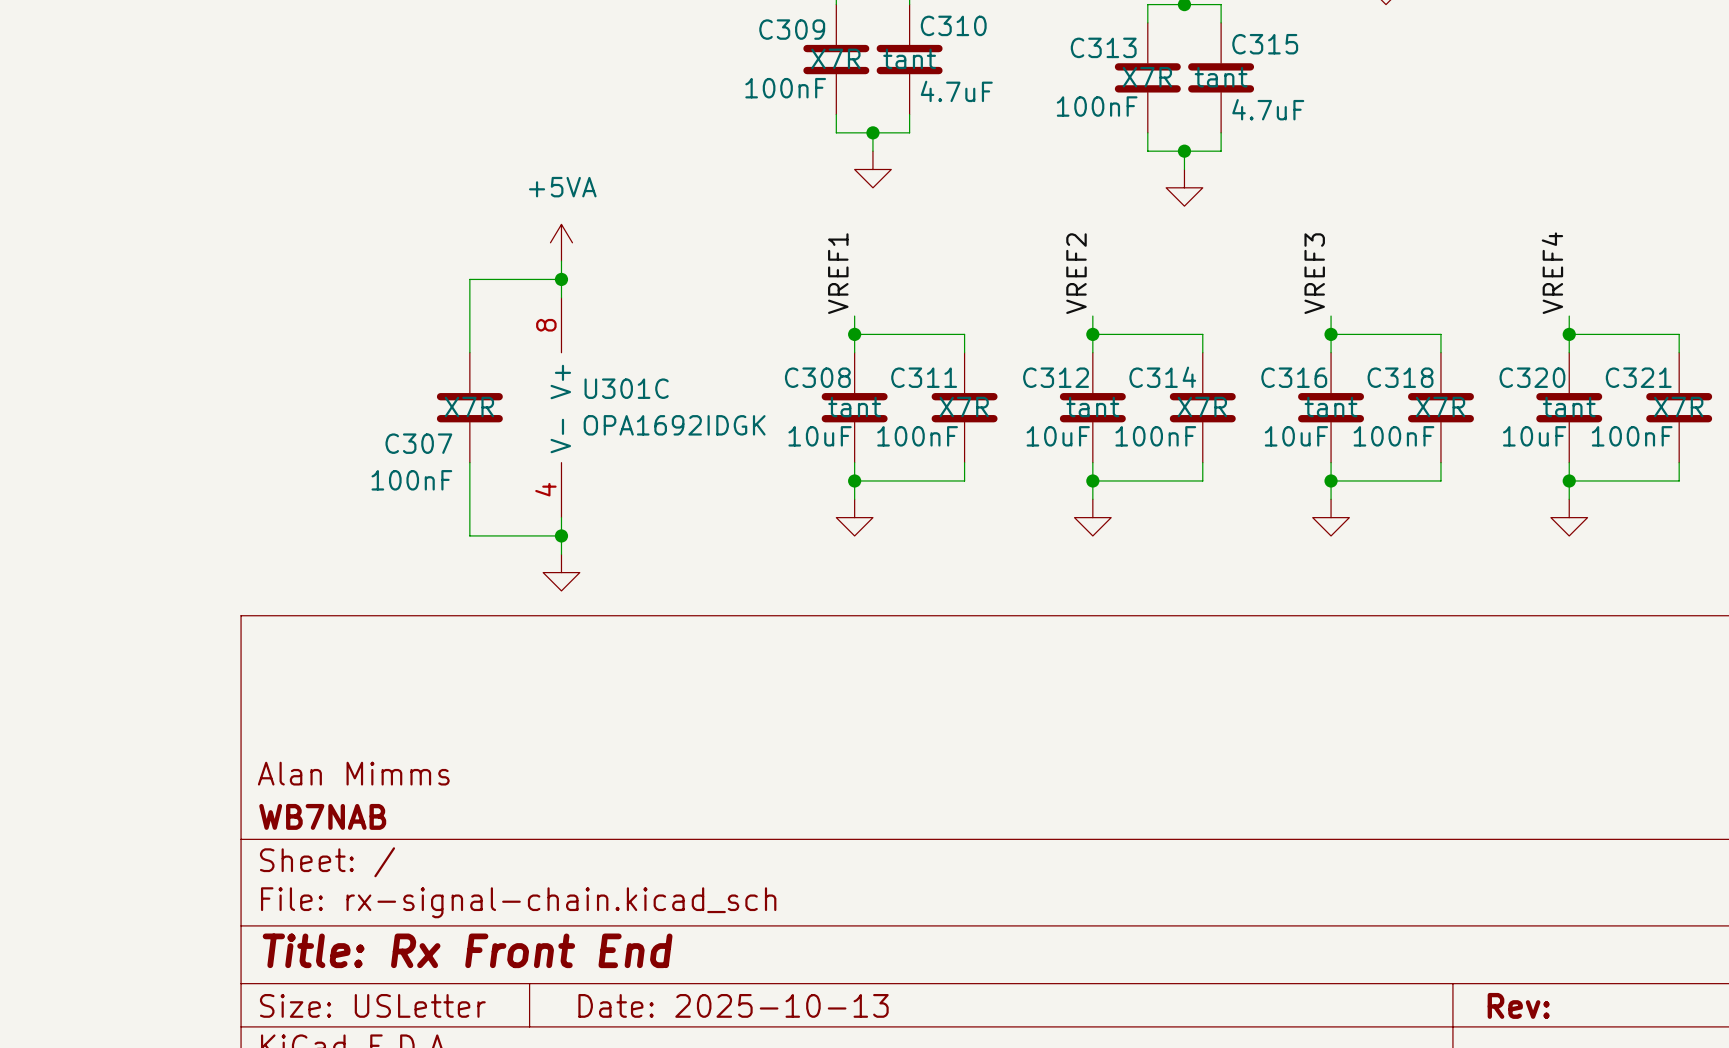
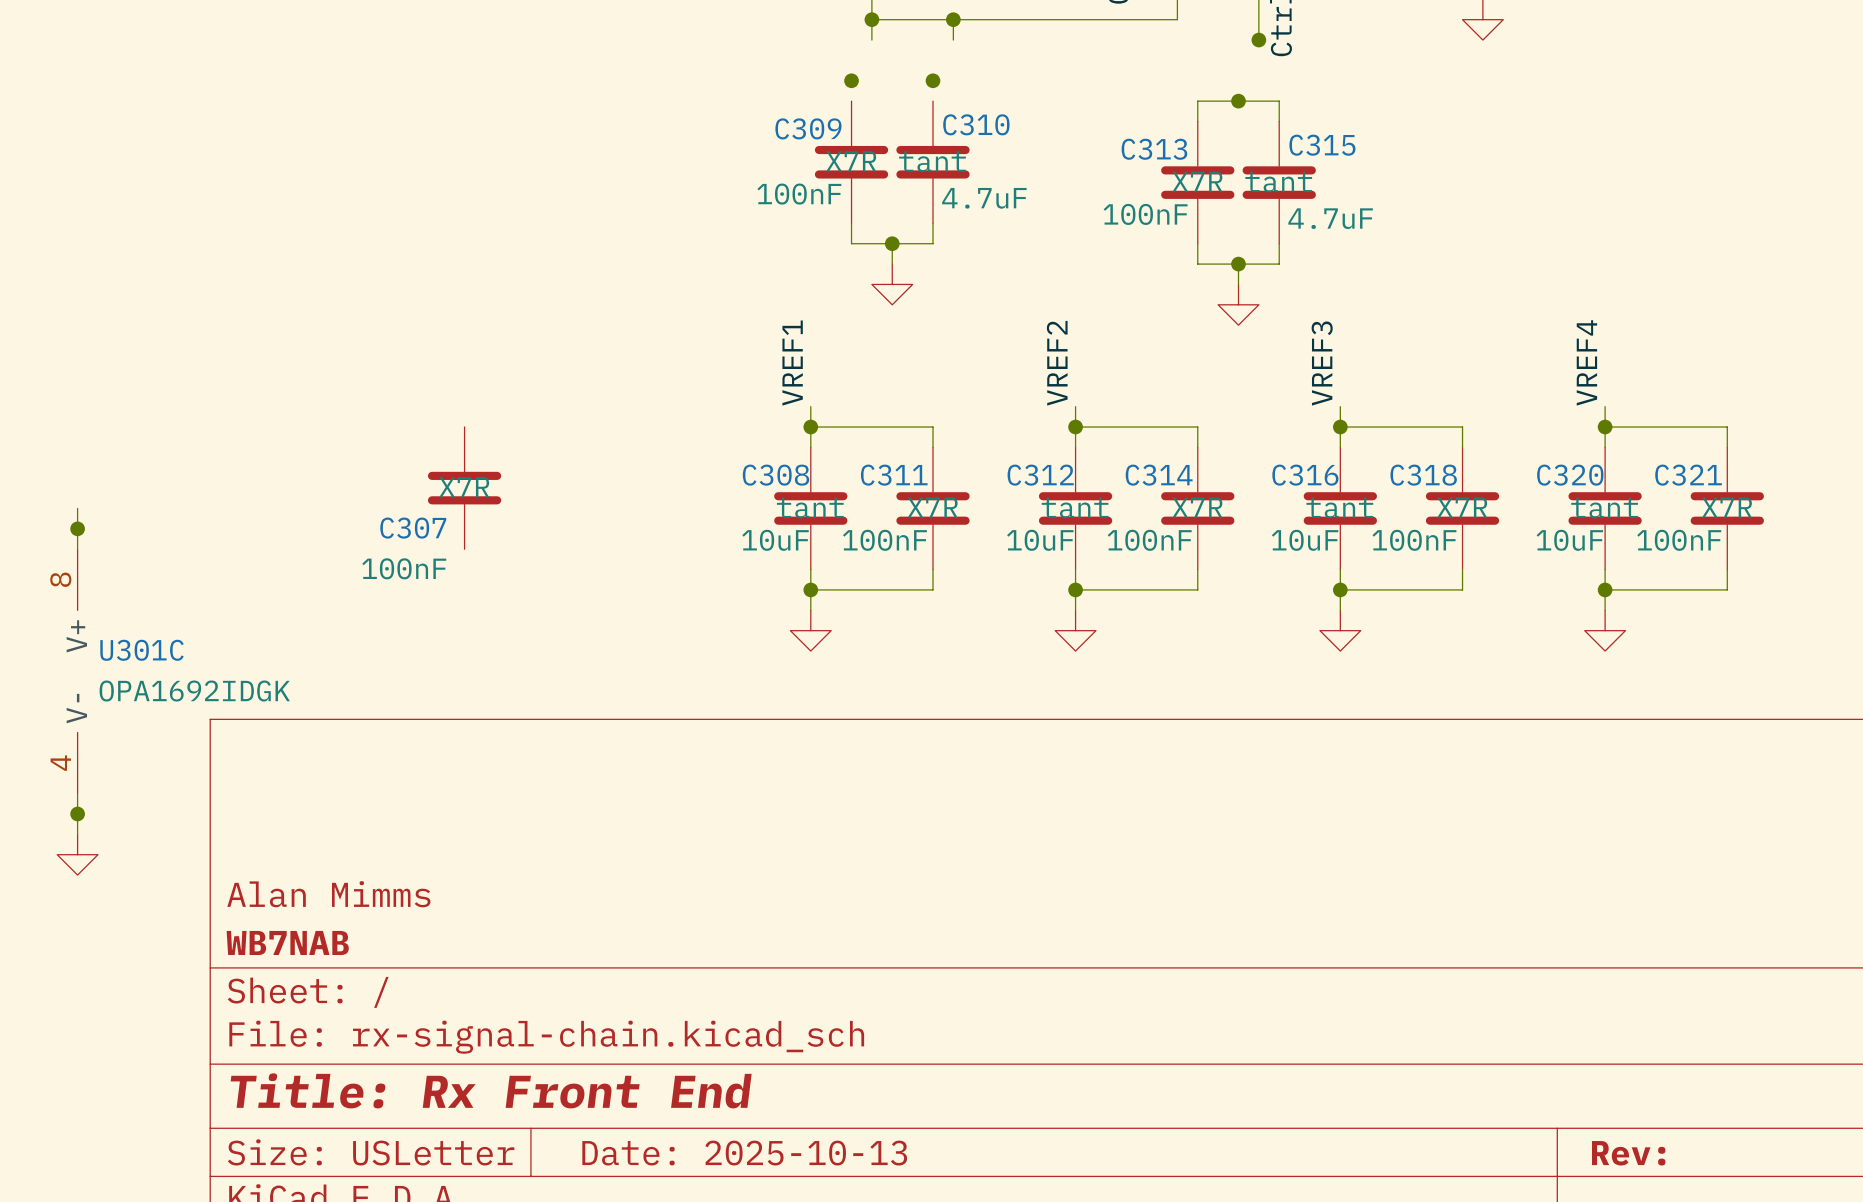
wire: (1147, 22) (1147, 4) (1221, 4) (1221, 22) -> (1197, 121) (1197, 101) (1279, 101) (1279, 121)
junction: none -> (851, 80)
junction: none -> (933, 80)
C309 position: (836, 59) -> (851, 162)
C310 position: (909, 59) -> (933, 162)
junction: none -> (1238, 101)
C313 position: (1147, 77) -> (1197, 182)
C315 position: (1221, 77) -> (1279, 182)
wire: (836, 114) (836, 132) (909, 132) (909, 114) -> (851, 223) (851, 243) (933, 243) (933, 223)
wire: (872, 132) (872, 151) -> (892, 243) (892, 264)
junction: (872, 132) -> none
wire: (1147, 132) (1147, 151) (1221, 151) (1221, 132) -> (1197, 243) (1197, 264) (1279, 264) (1279, 243)
wire: (1184, 151) (1184, 169) -> (1238, 264) (1238, 284)
junction: (1184, 151) -> none
power symbol position: (872, 169) -> (892, 284)
junction: none -> (892, 243)
power symbol position: (1184, 187) -> (1238, 304)
junction: none -> (1238, 264)
power symbol: +5VA (561, 242) -> none
wire: (561, 261) (561, 297) -> none
label position: VREF1 (838, 273) -> VREF1 (792, 363)
label position: VREF2 (1076, 273) -> VREF2 (1057, 363)
label position: VREF3 (1314, 273) -> VREF3 (1322, 363)
label position: VREF4 (1552, 273) -> VREF4 (1586, 362)
wire: (561, 279) (469, 279) (469, 352) -> none
junction: (561, 279) -> none
wire: (854, 316) (854, 352) -> (810, 406) (810, 447)
wire: (1092, 316) (1092, 352) -> (1075, 406) (1075, 447)
wire: (1331, 316) (1331, 352) -> (1340, 406) (1340, 447)
wire: (1569, 316) (1569, 352) -> (1605, 406) (1605, 447)
wire: (854, 334) (964, 334) (964, 352) -> (810, 427) (933, 427) (933, 447)
junction: (854, 334) -> none
wire: (1092, 334) (1202, 334) (1202, 352) -> (1075, 427) (1197, 427) (1197, 447)
junction: (1092, 334) -> none
wire: (1331, 334) (1440, 334) (1440, 352) -> (1340, 427) (1462, 427) (1462, 447)
junction: (1331, 334) -> none
wire: (1569, 334) (1679, 334) (1679, 352) -> (1605, 427) (1727, 427) (1727, 447)
junction: (1569, 334) -> none
junction: none -> (810, 427)
junction: none -> (1075, 427)
junction: none -> (1340, 427)
junction: none -> (1605, 427)
U301C position: (561, 407) -> (77, 671)
C308 position: (854, 407) -> (810, 508)
C311 position: (964, 407) -> (933, 508)
C312 position: (1092, 407) -> (1075, 508)
C314 position: (1202, 407) -> (1197, 508)
C316 position: (1331, 407) -> (1340, 508)
C318 position: (1440, 407) -> (1462, 508)
C320 position: (1569, 407) -> (1605, 508)
C321 position: (1679, 407) -> (1727, 508)
wire: none -> (77, 508) (77, 549)
junction: none -> (77, 528)
wire: (469, 462) (469, 535) (561, 535) -> none
wire: (854, 462) (854, 499) -> (810, 569) (810, 610)
wire: (964, 462) (964, 480) (854, 480) -> (933, 569) (933, 589) (810, 589)
wire: (1092, 462) (1092, 499) -> (1075, 569) (1075, 610)
wire: (1202, 462) (1202, 480) (1092, 480) -> (1197, 569) (1197, 589) (1075, 589)
wire: (1331, 462) (1331, 499) -> (1340, 569) (1340, 610)
wire: (1440, 462) (1440, 480) (1331, 480) -> (1462, 569) (1462, 589) (1340, 589)
wire: (1569, 462) (1569, 499) -> (1605, 569) (1605, 610)
wire: (1679, 462) (1679, 480) (1569, 480) -> (1727, 569) (1727, 589) (1605, 589)
junction: (854, 480) -> none
junction: (1092, 480) -> none
junction: (1331, 480) -> none
junction: (1569, 480) -> none
junction: none -> (810, 589)
junction: none -> (1075, 589)
junction: none -> (1340, 589)
junction: none -> (1605, 589)
wire: (561, 517) (561, 554) -> none
power symbol position: (854, 517) -> (810, 630)
power symbol position: (1092, 517) -> (1075, 630)
power symbol position: (1331, 517) -> (1340, 630)
power symbol position: (1569, 517) -> (1605, 630)
junction: (561, 535) -> none
power symbol: (561, 572) -> none
wire: none -> (77, 793) (77, 834)
junction: none -> (77, 813)
power symbol: none -> (77, 854)

